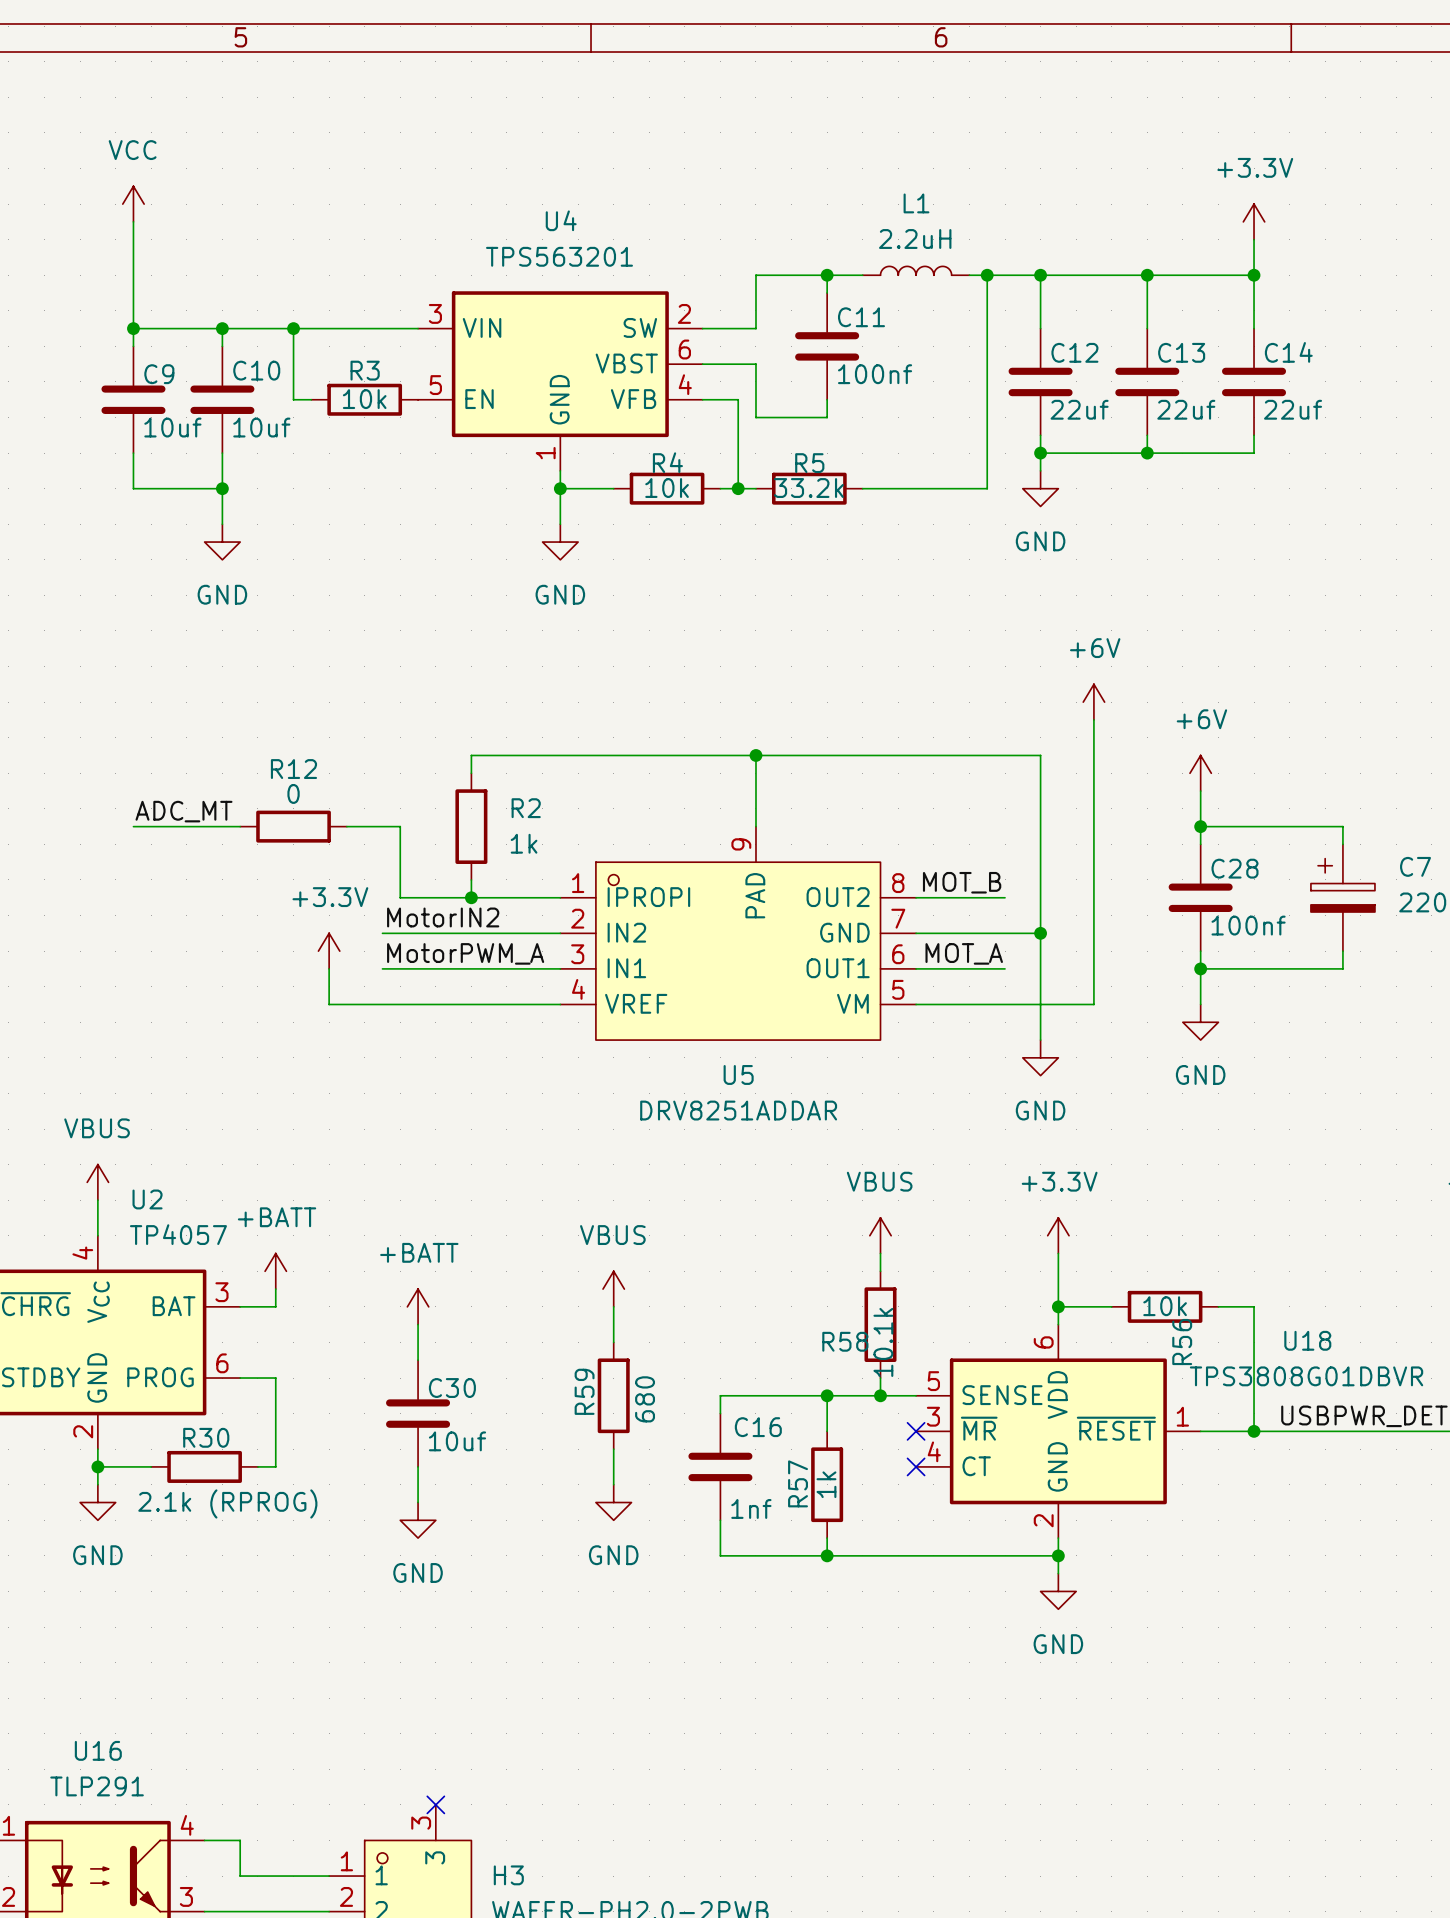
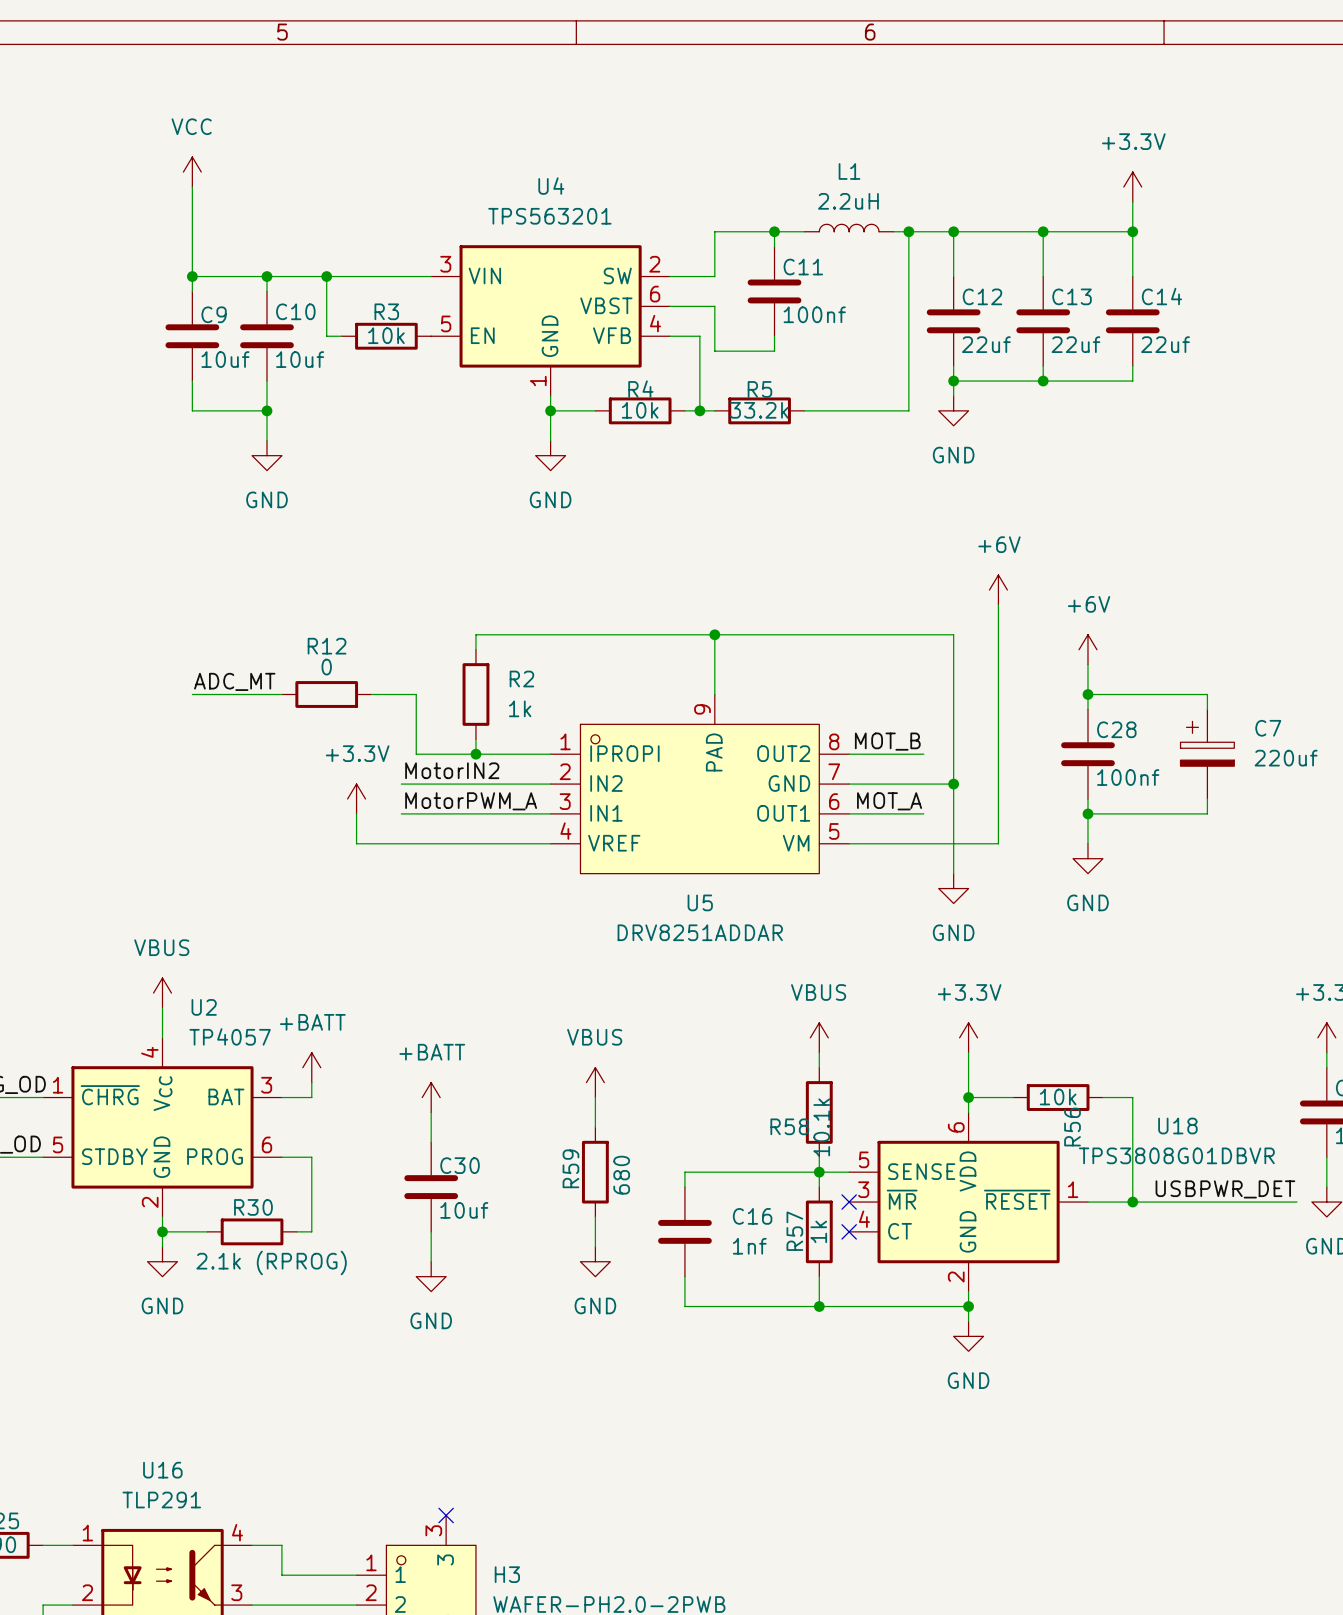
wire: (827, 1395) (827, 1431) -> (819, 1276) (819, 1306)
junction: (827, 1395) -> none
C16 name position: C16 (758, 1427) -> C16 (752, 1216)
R57 position: (827, 1484) -> (819, 1231)
C16 value position: 1nf (751, 1508) -> 1nf (749, 1246)
wire: (827, 1538) (827, 1555) -> (819, 1172) (819, 1187)
junction position: (827, 1555) -> (819, 1306)

